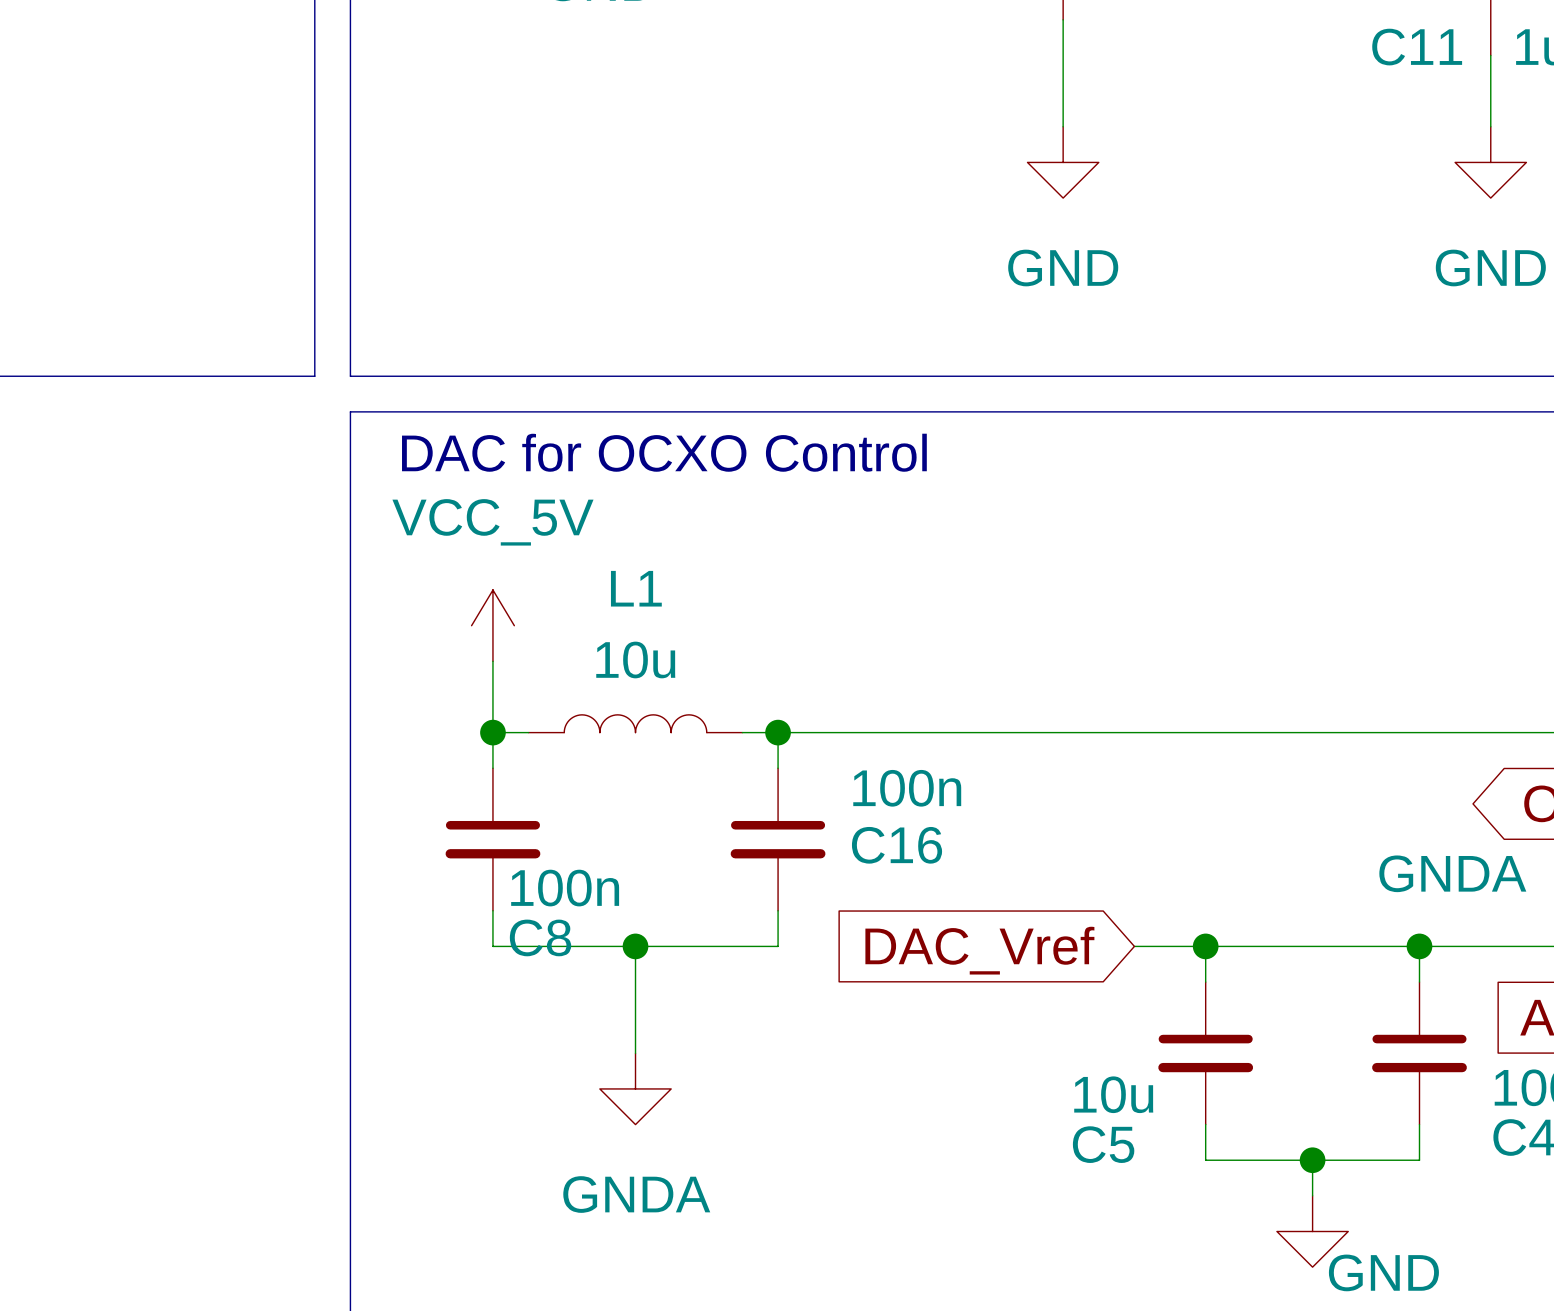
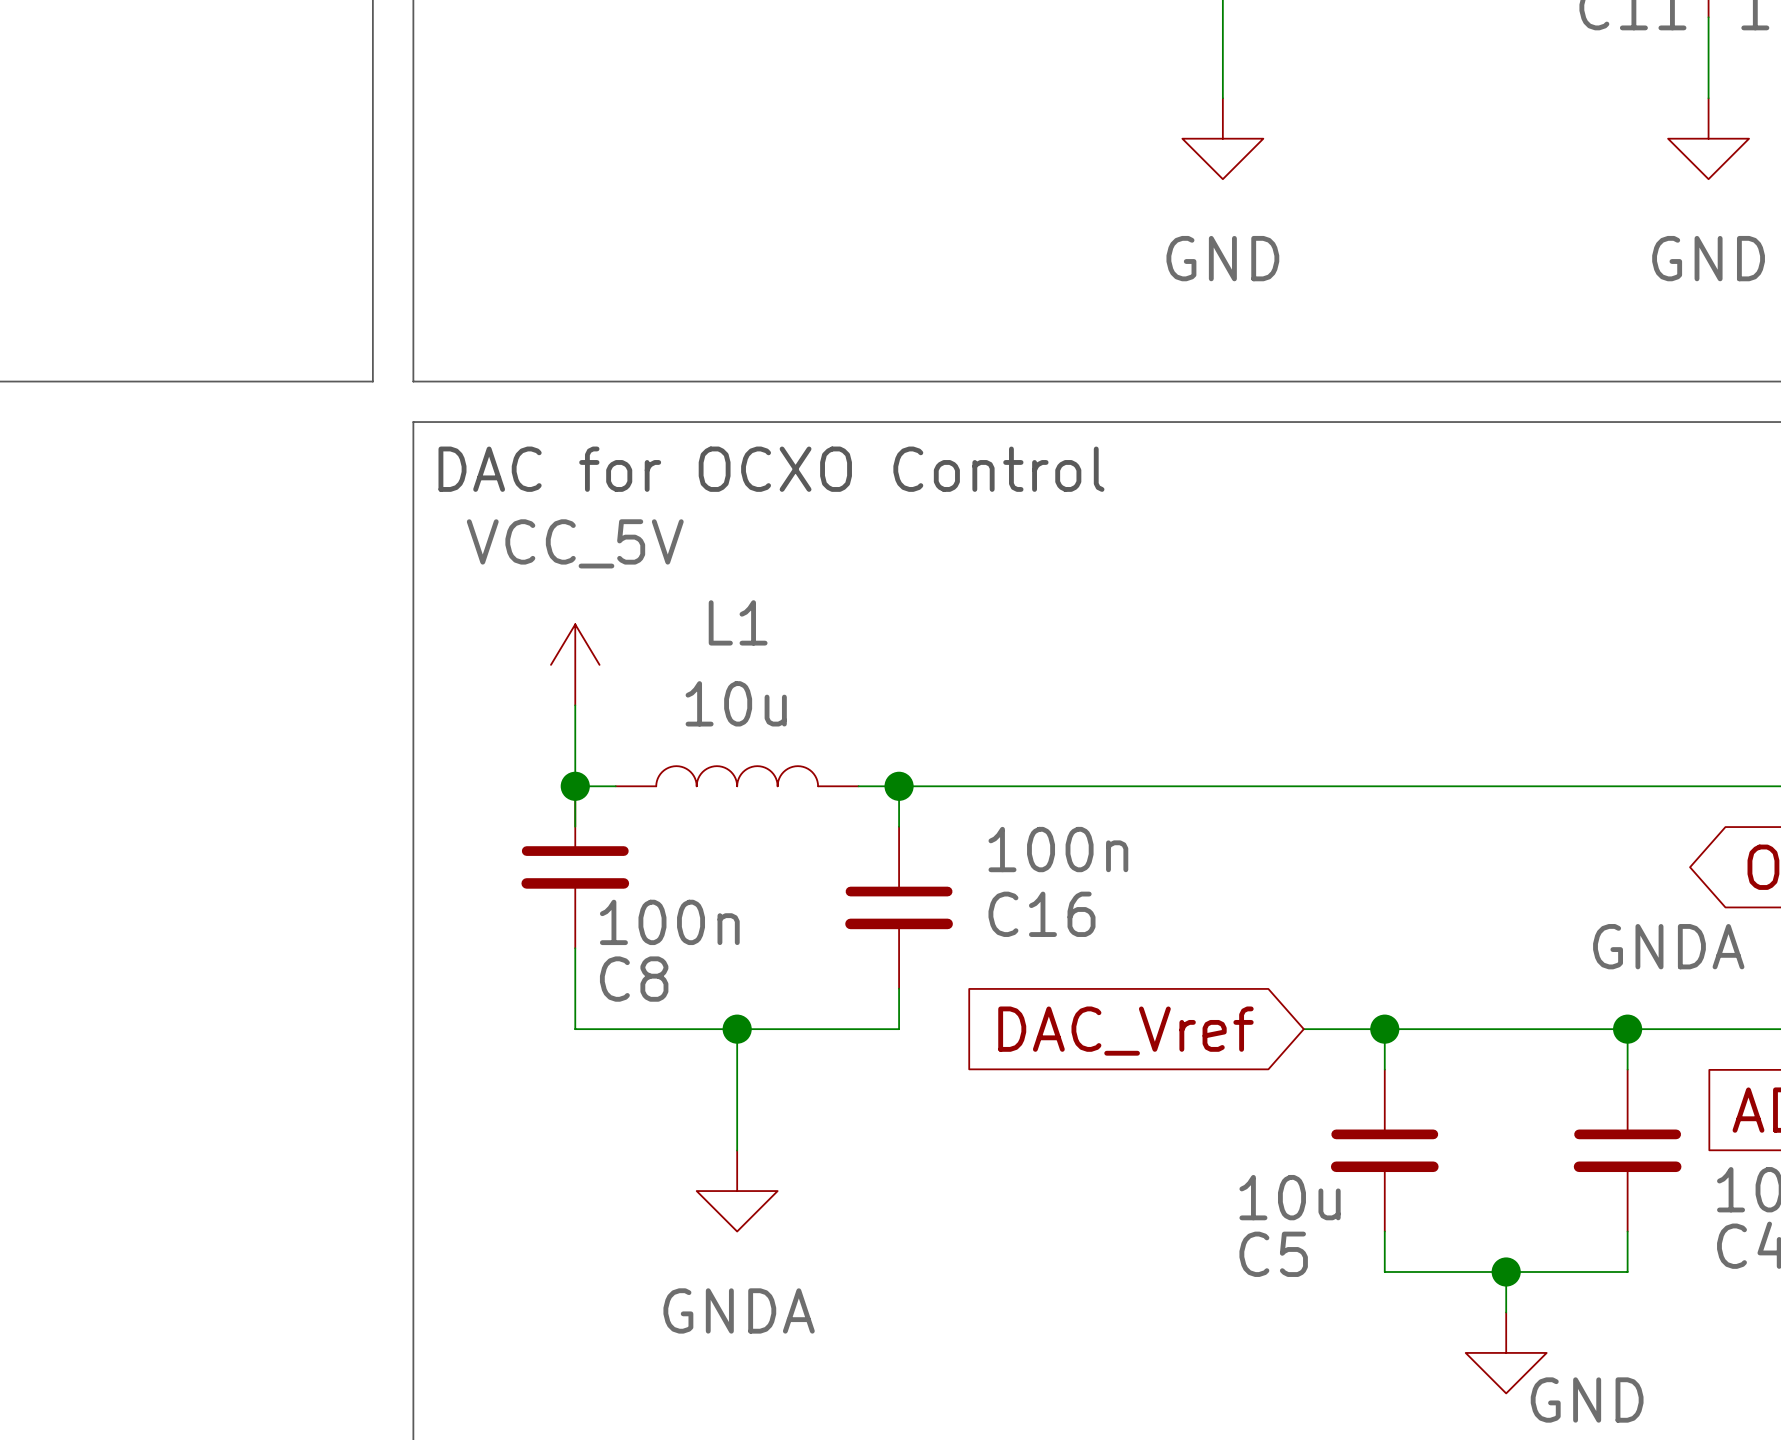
C8 position: (492, 839) -> (575, 867)

